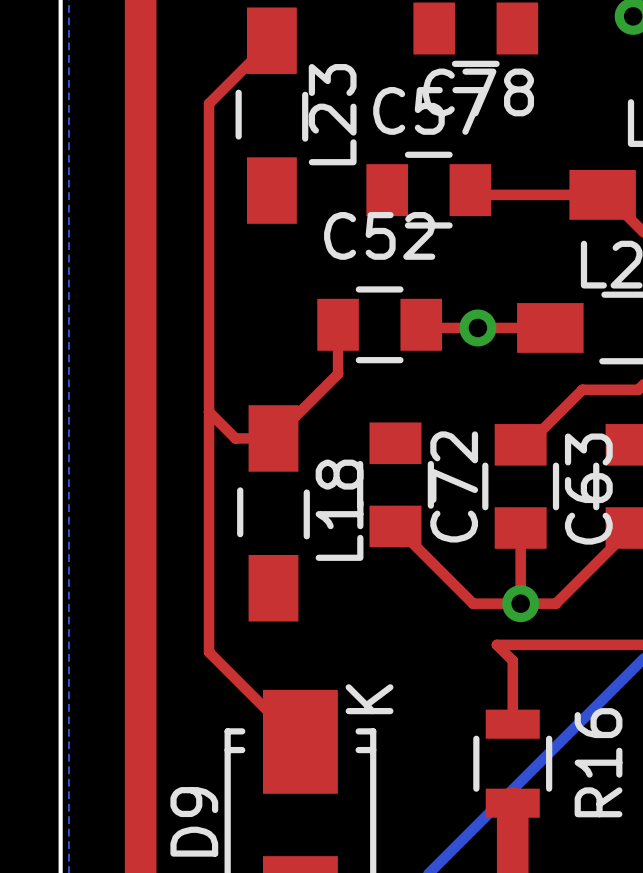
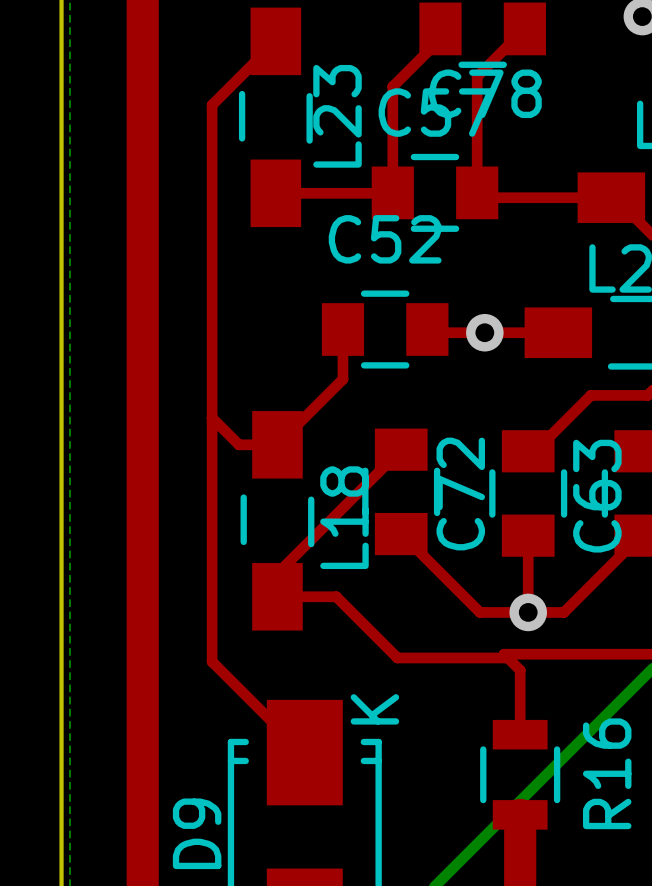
top track: none -> (440, 28) (440, 38) (392, 86) (392, 192)
top track: none -> (524, 28) (477, 76) (477, 192)
top track: none -> (275, 193) (392, 193)
top track: none -> (401, 449) (277, 573) (277, 596) (336, 596) (397, 657) (507, 657)

